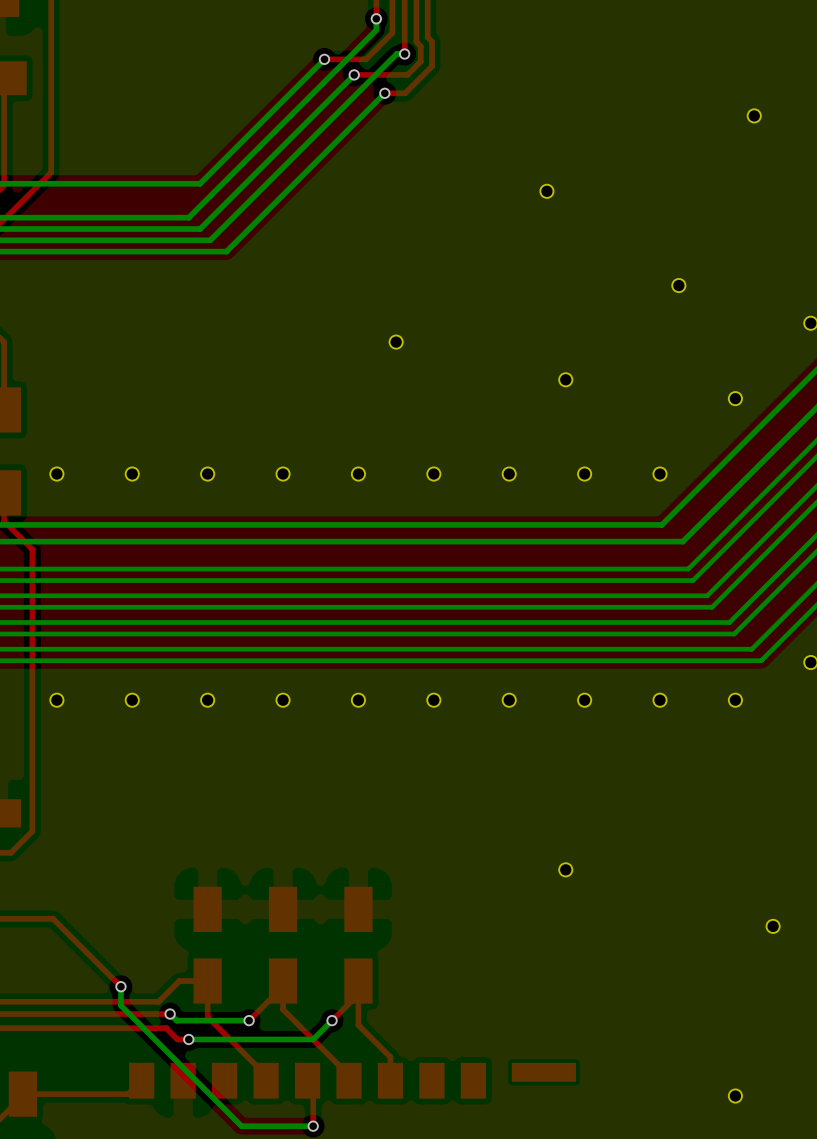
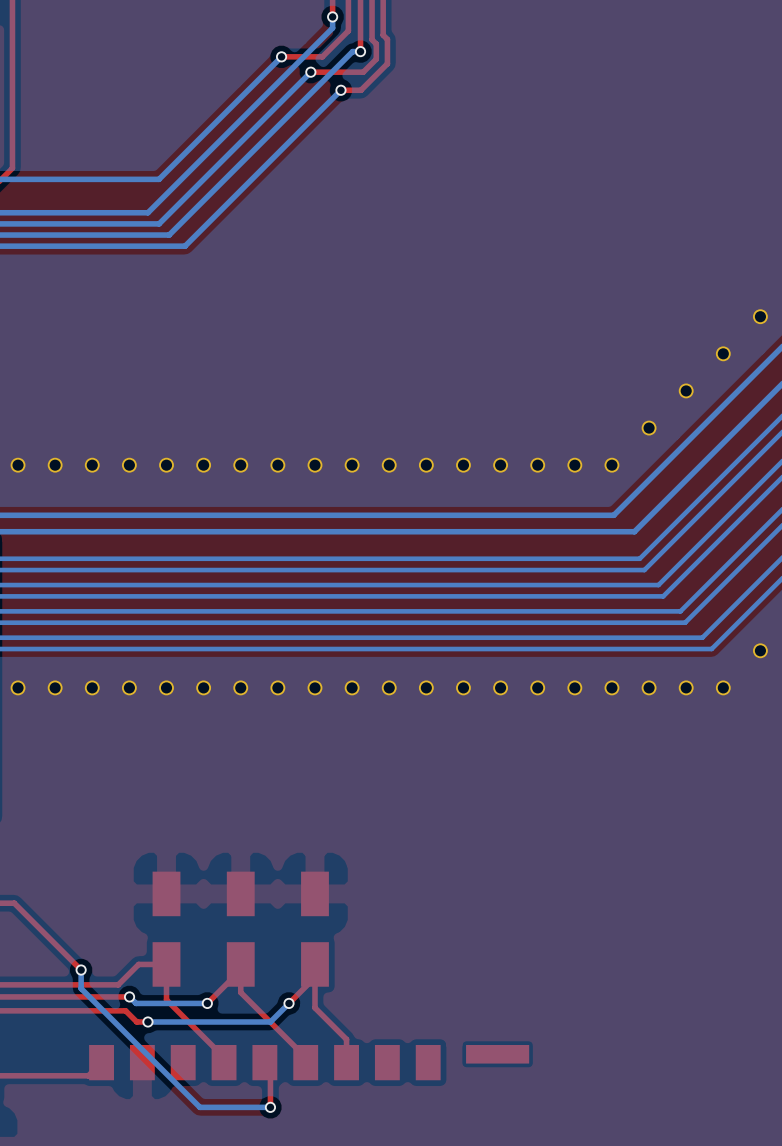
part: (754, 115) -> none
part: (546, 191) -> none
part: (678, 285) -> none
part: (396, 342) -> none
part: none -> (723, 353)
part: (565, 379) -> none
part: none -> (649, 428)
part: none -> (55, 465)
part: none -> (129, 465)
part: none -> (203, 465)
part: none -> (277, 465)
part: none -> (352, 465)
part: none -> (426, 465)
part: none -> (500, 465)
part: none -> (574, 465)
part: none -> (55, 687)
part: none -> (129, 687)
part: none -> (203, 687)
part: none -> (277, 687)
part: none -> (352, 687)
part: none -> (426, 687)
part: none -> (500, 687)
part: none -> (574, 687)
part: none -> (649, 687)
part: none -> (723, 687)
part: (565, 869) -> none
part: (773, 926) -> none
part: (735, 1096) -> none

